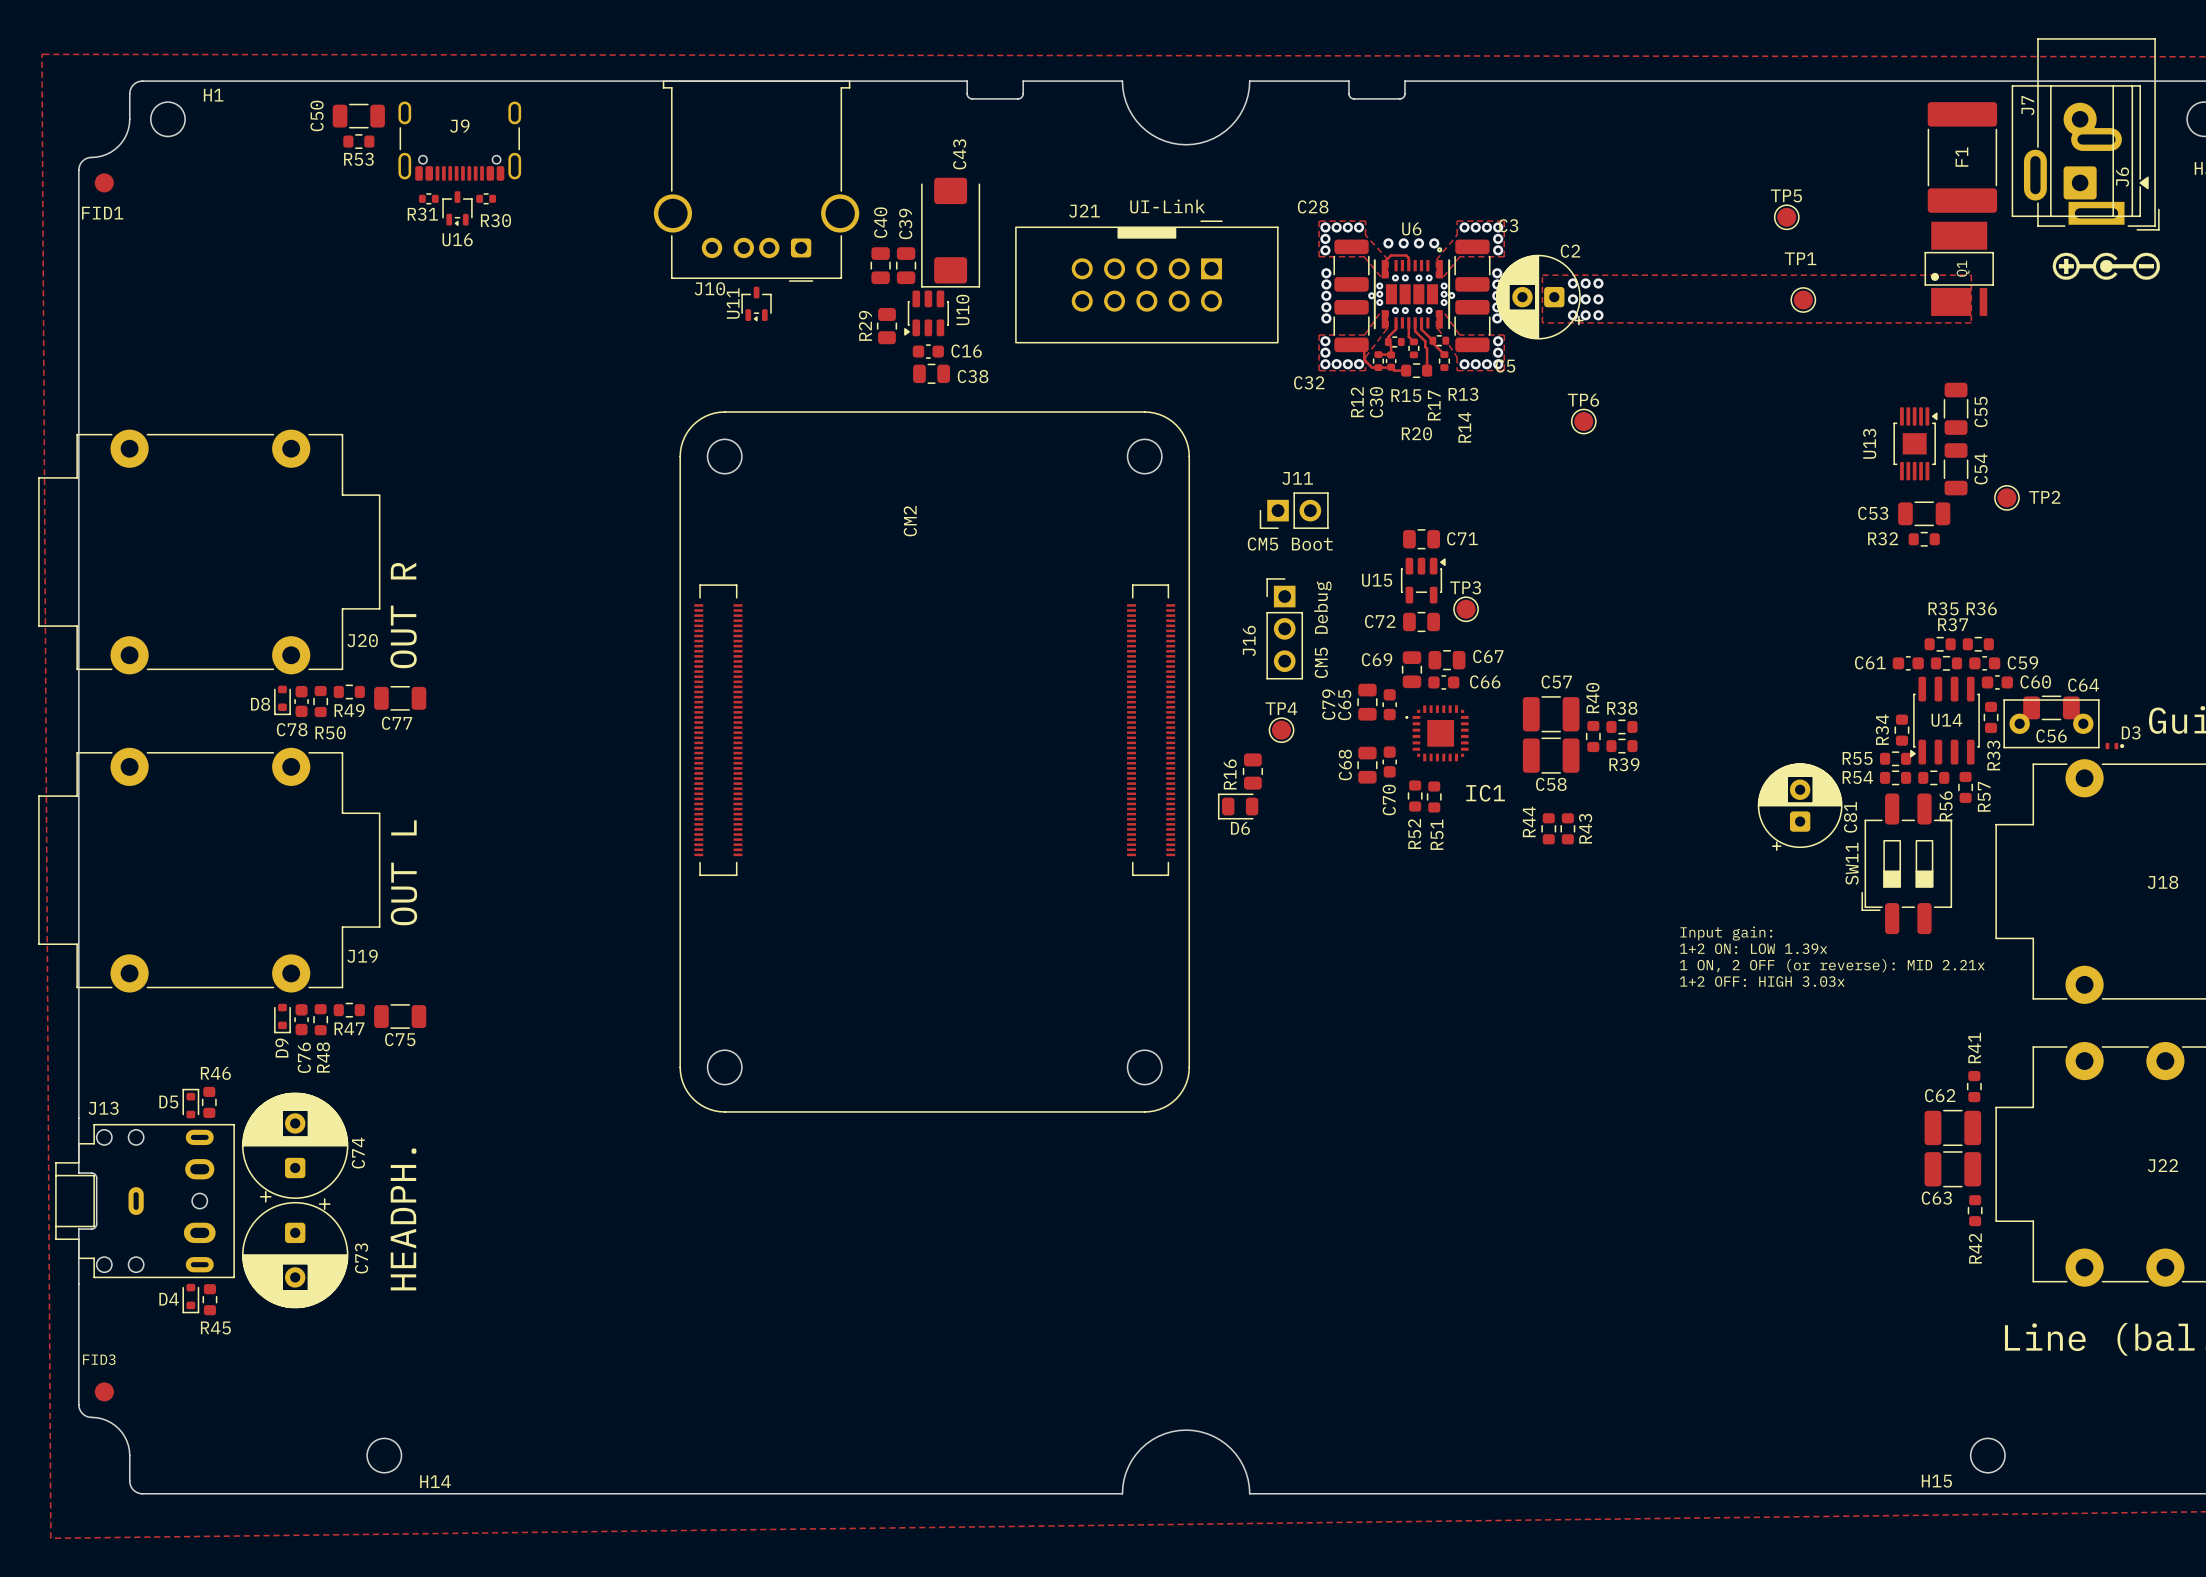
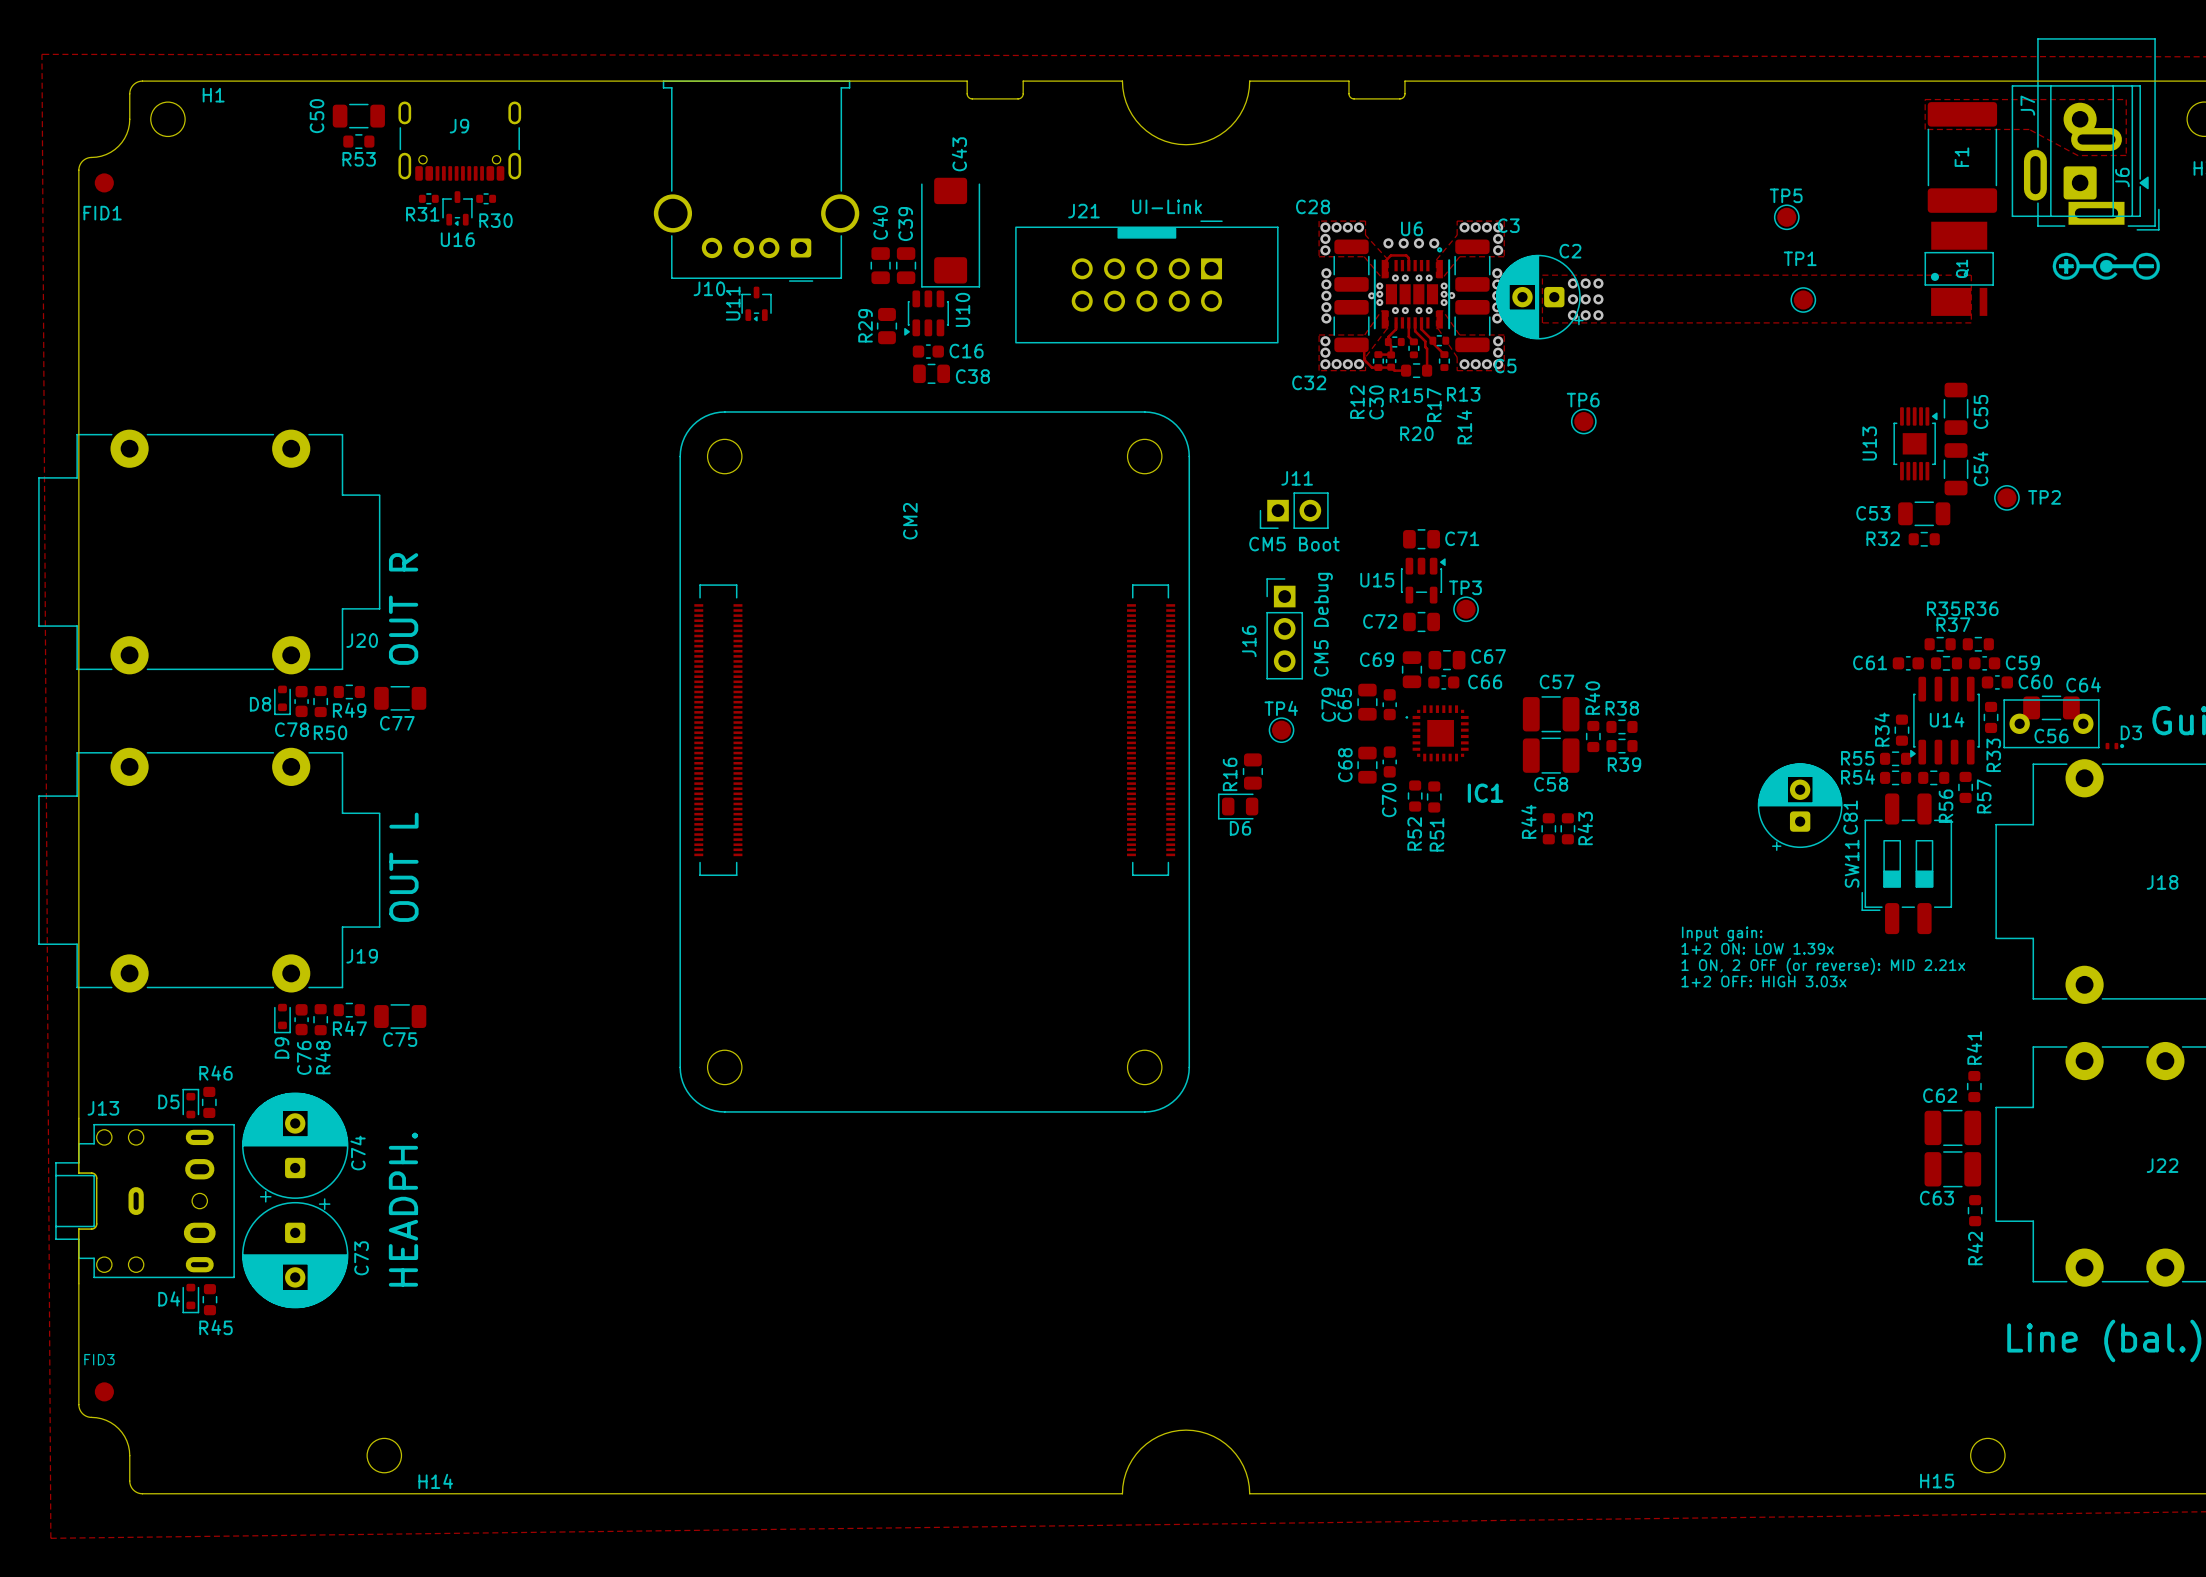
zone outline: none -> (1925, 99) (2126, 99) (2126, 155) (2077, 155) (2029, 129) (1925, 129) (1925, 99)

